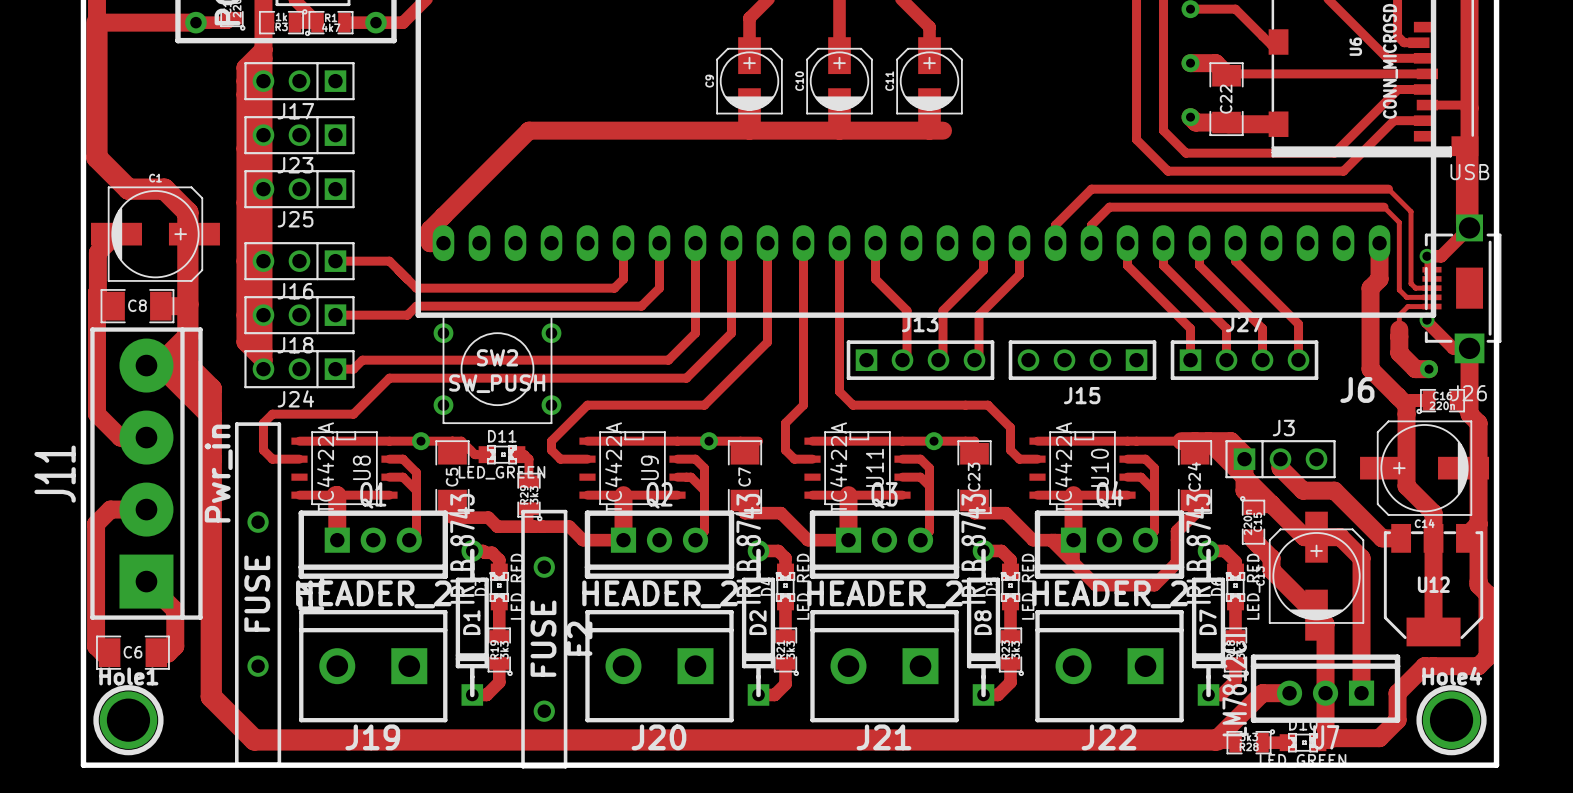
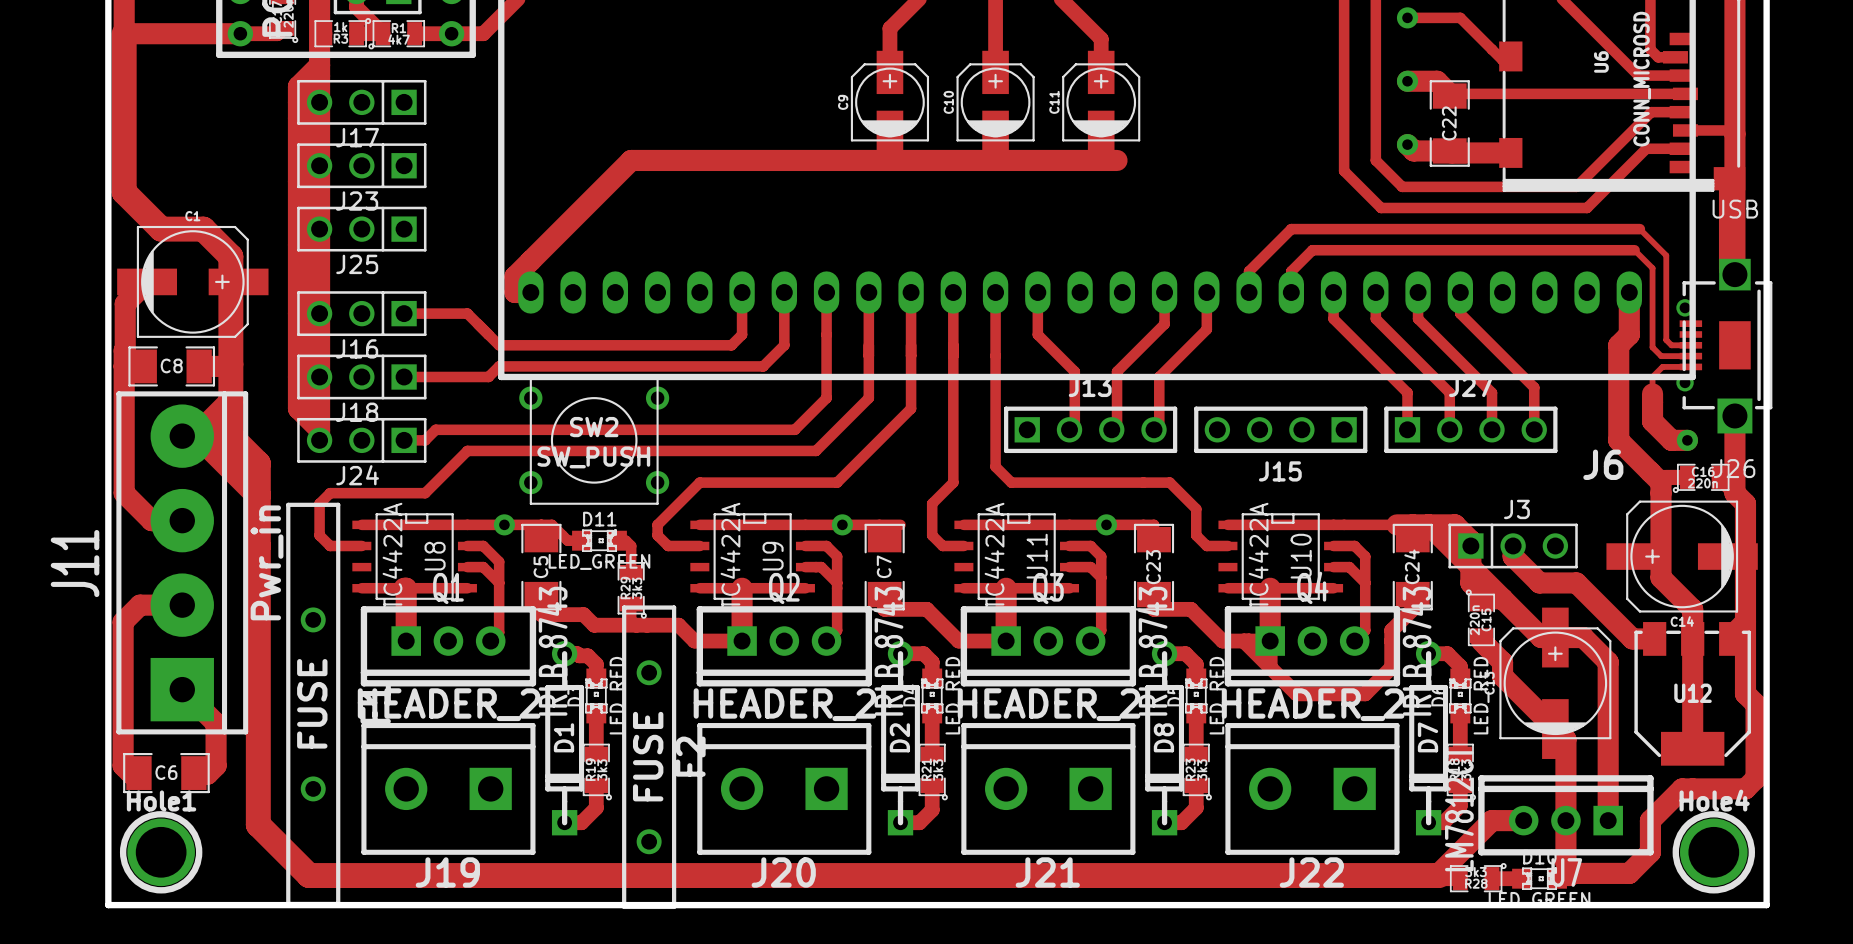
track: (1469, 227) (1441, 256) (1427, 256) (1427, 273) (1431, 278) (1431, 264) (1427, 259) -> none
track: (1427, 320) (1453, 348) (1469, 348) -> none

